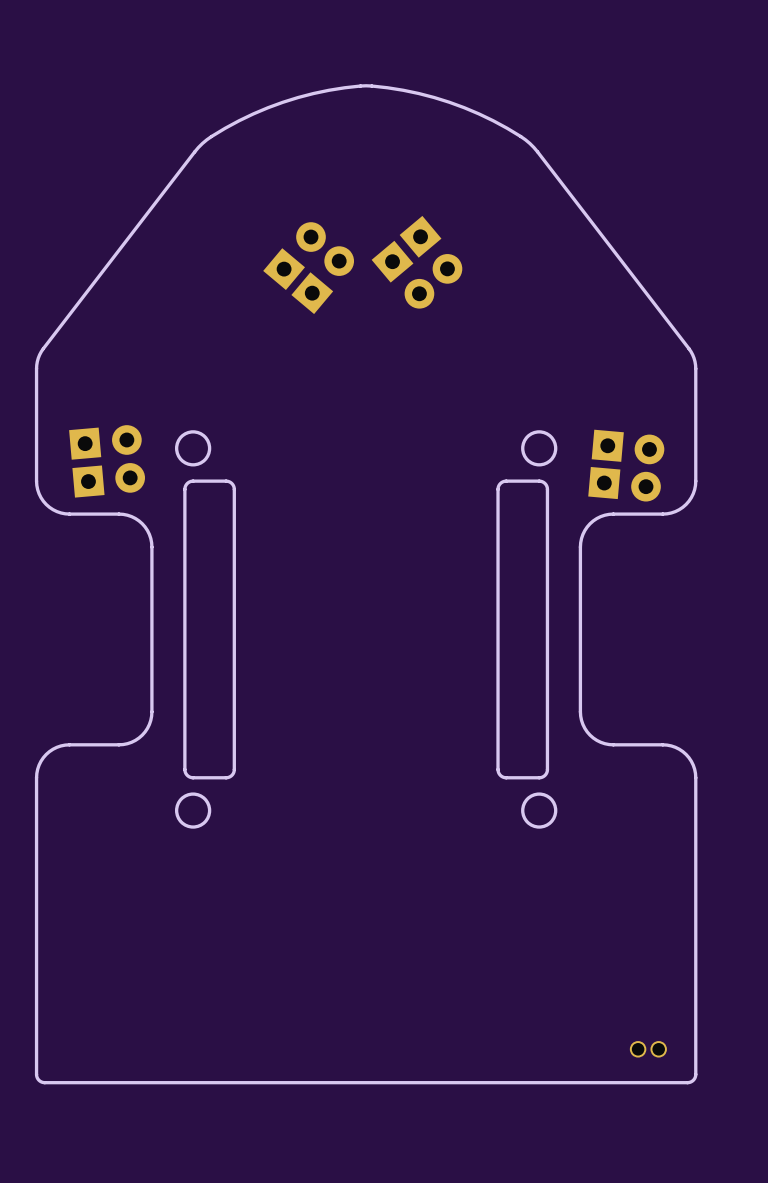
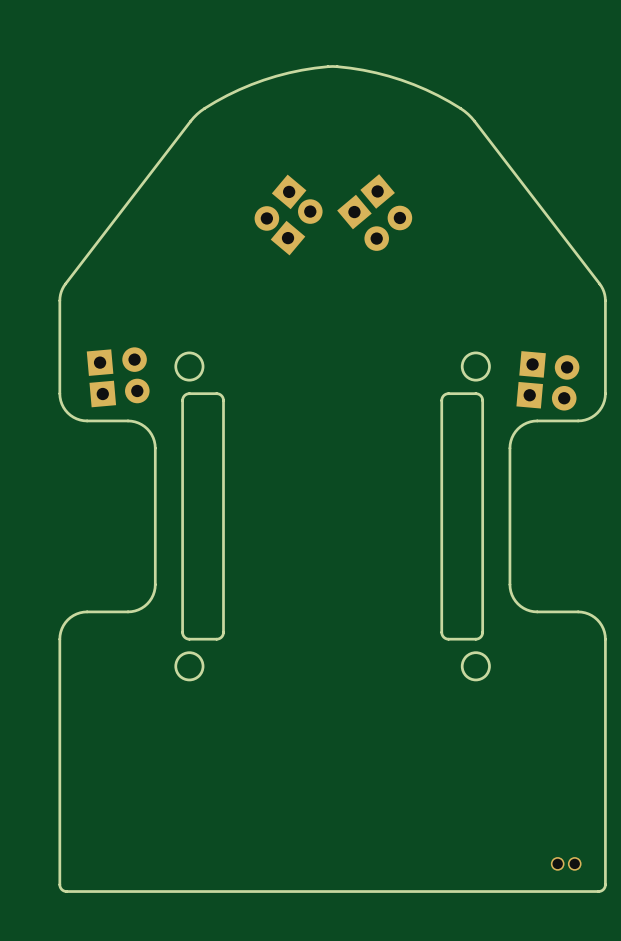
part rotation: 0° (294, 256) -> 180° (280, 202)

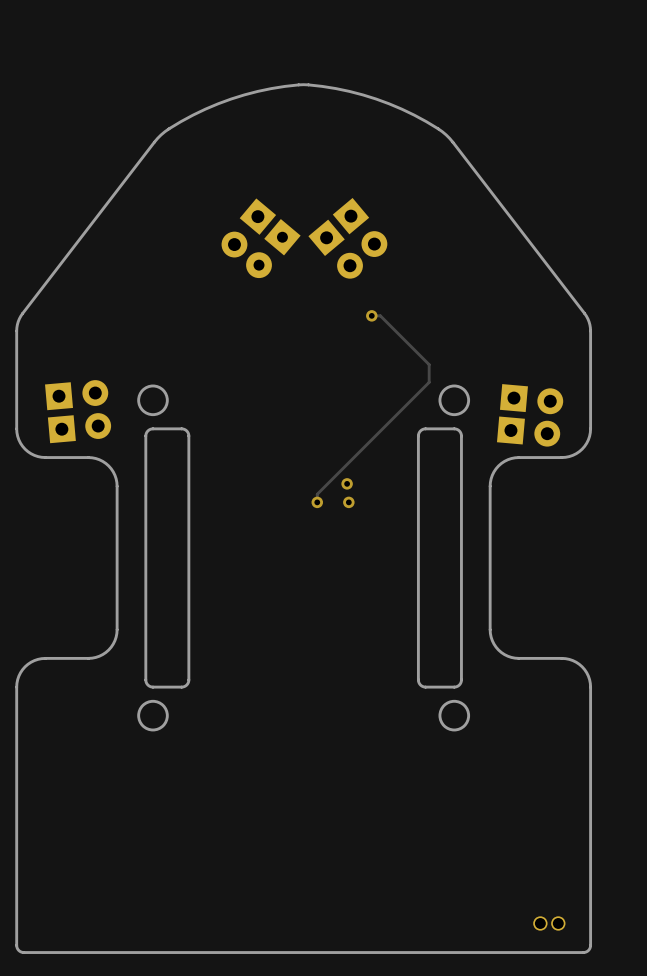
part footprint: [270, 199, 323, 256] -> [246, 219, 301, 279]
track: none -> (371, 315) (380, 315) (429, 364) (429, 382) (317, 494) (317, 502)
via: none -> (371, 315)
via: none -> (347, 483)
via: none -> (317, 502)
via: none -> (348, 502)

